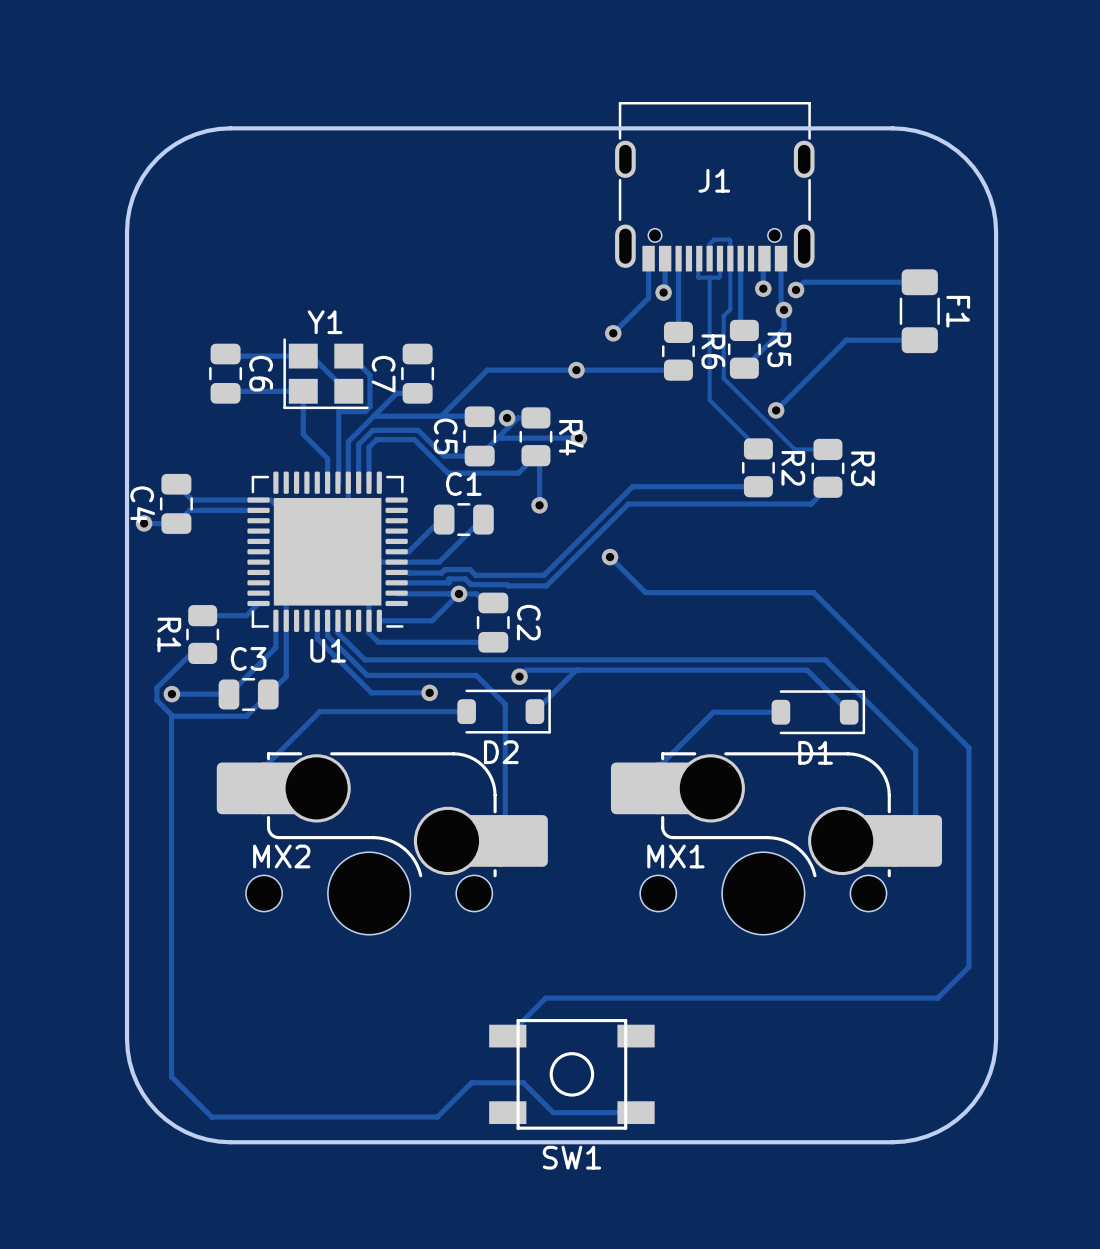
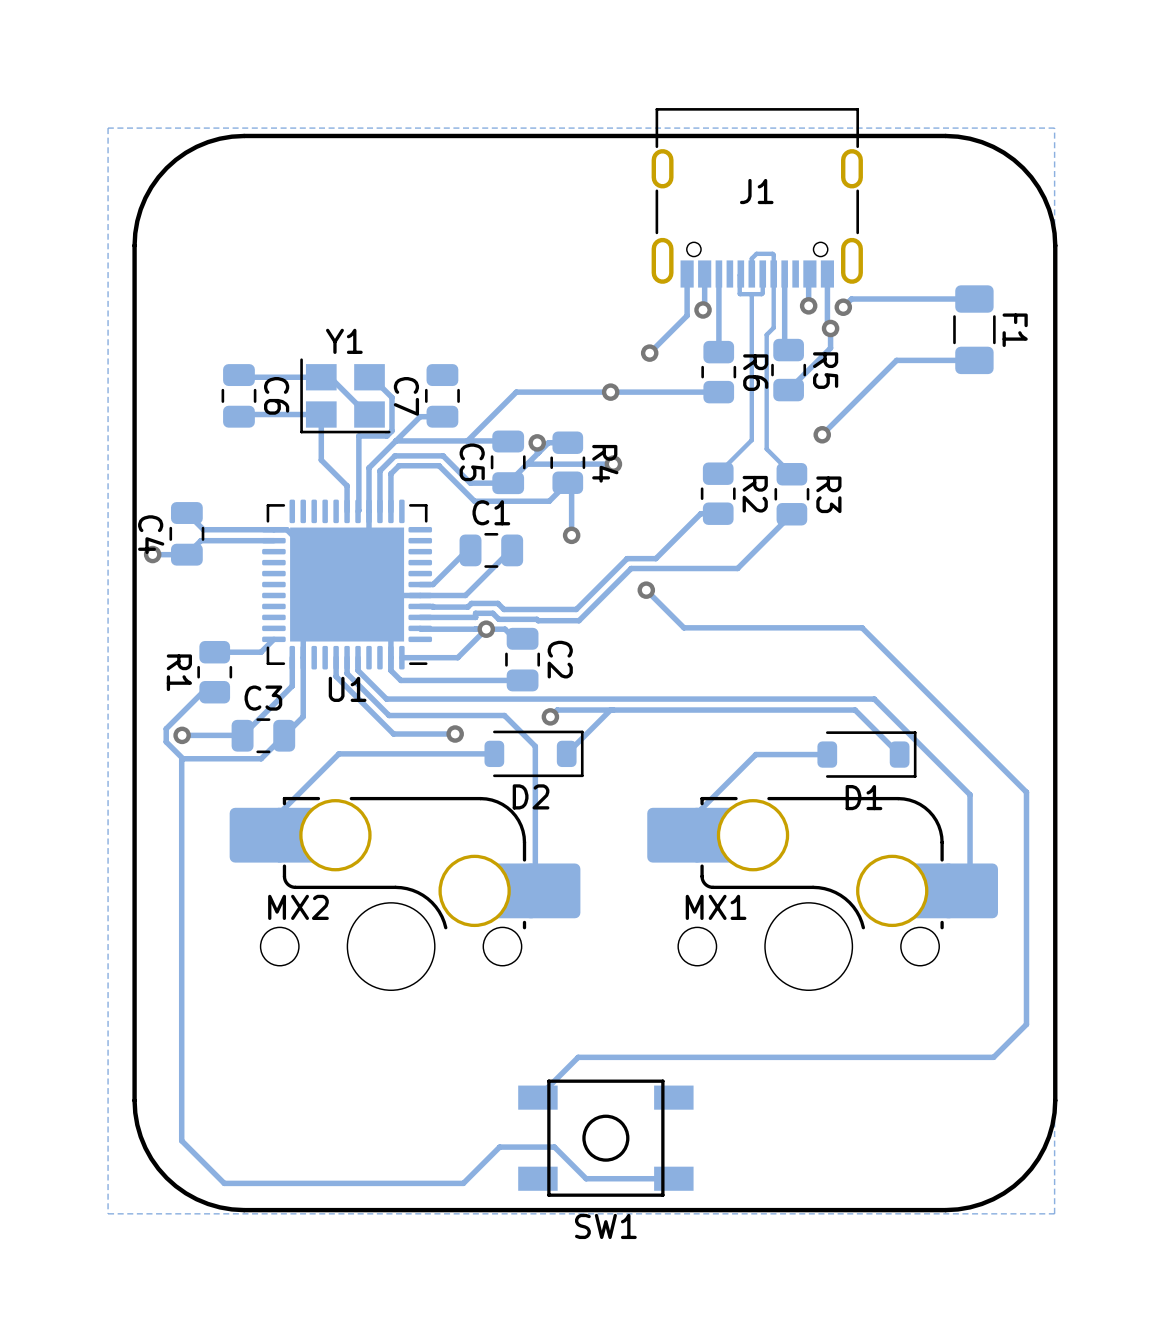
zone outline: none -> (1054, 128) (108, 128) (108, 1213) (1054, 1213) (1054, 128)
track: (723, 378) (794, 449) (827, 449) -> (766, 400) (766, 449) (791, 474)
track: (709, 400) (758, 448) -> (751, 423) (751, 440) (718, 473)
R2 position: (758, 467) -> (718, 493)
R3 position: (827, 468) -> (791, 494)
track: (758, 486) (632, 486) (591, 527) -> (718, 513) (700, 513) (655, 558) (627, 558)
track: (827, 487) (811, 504) (628, 504) (595, 536) -> (791, 514) (737, 568) (631, 568)

